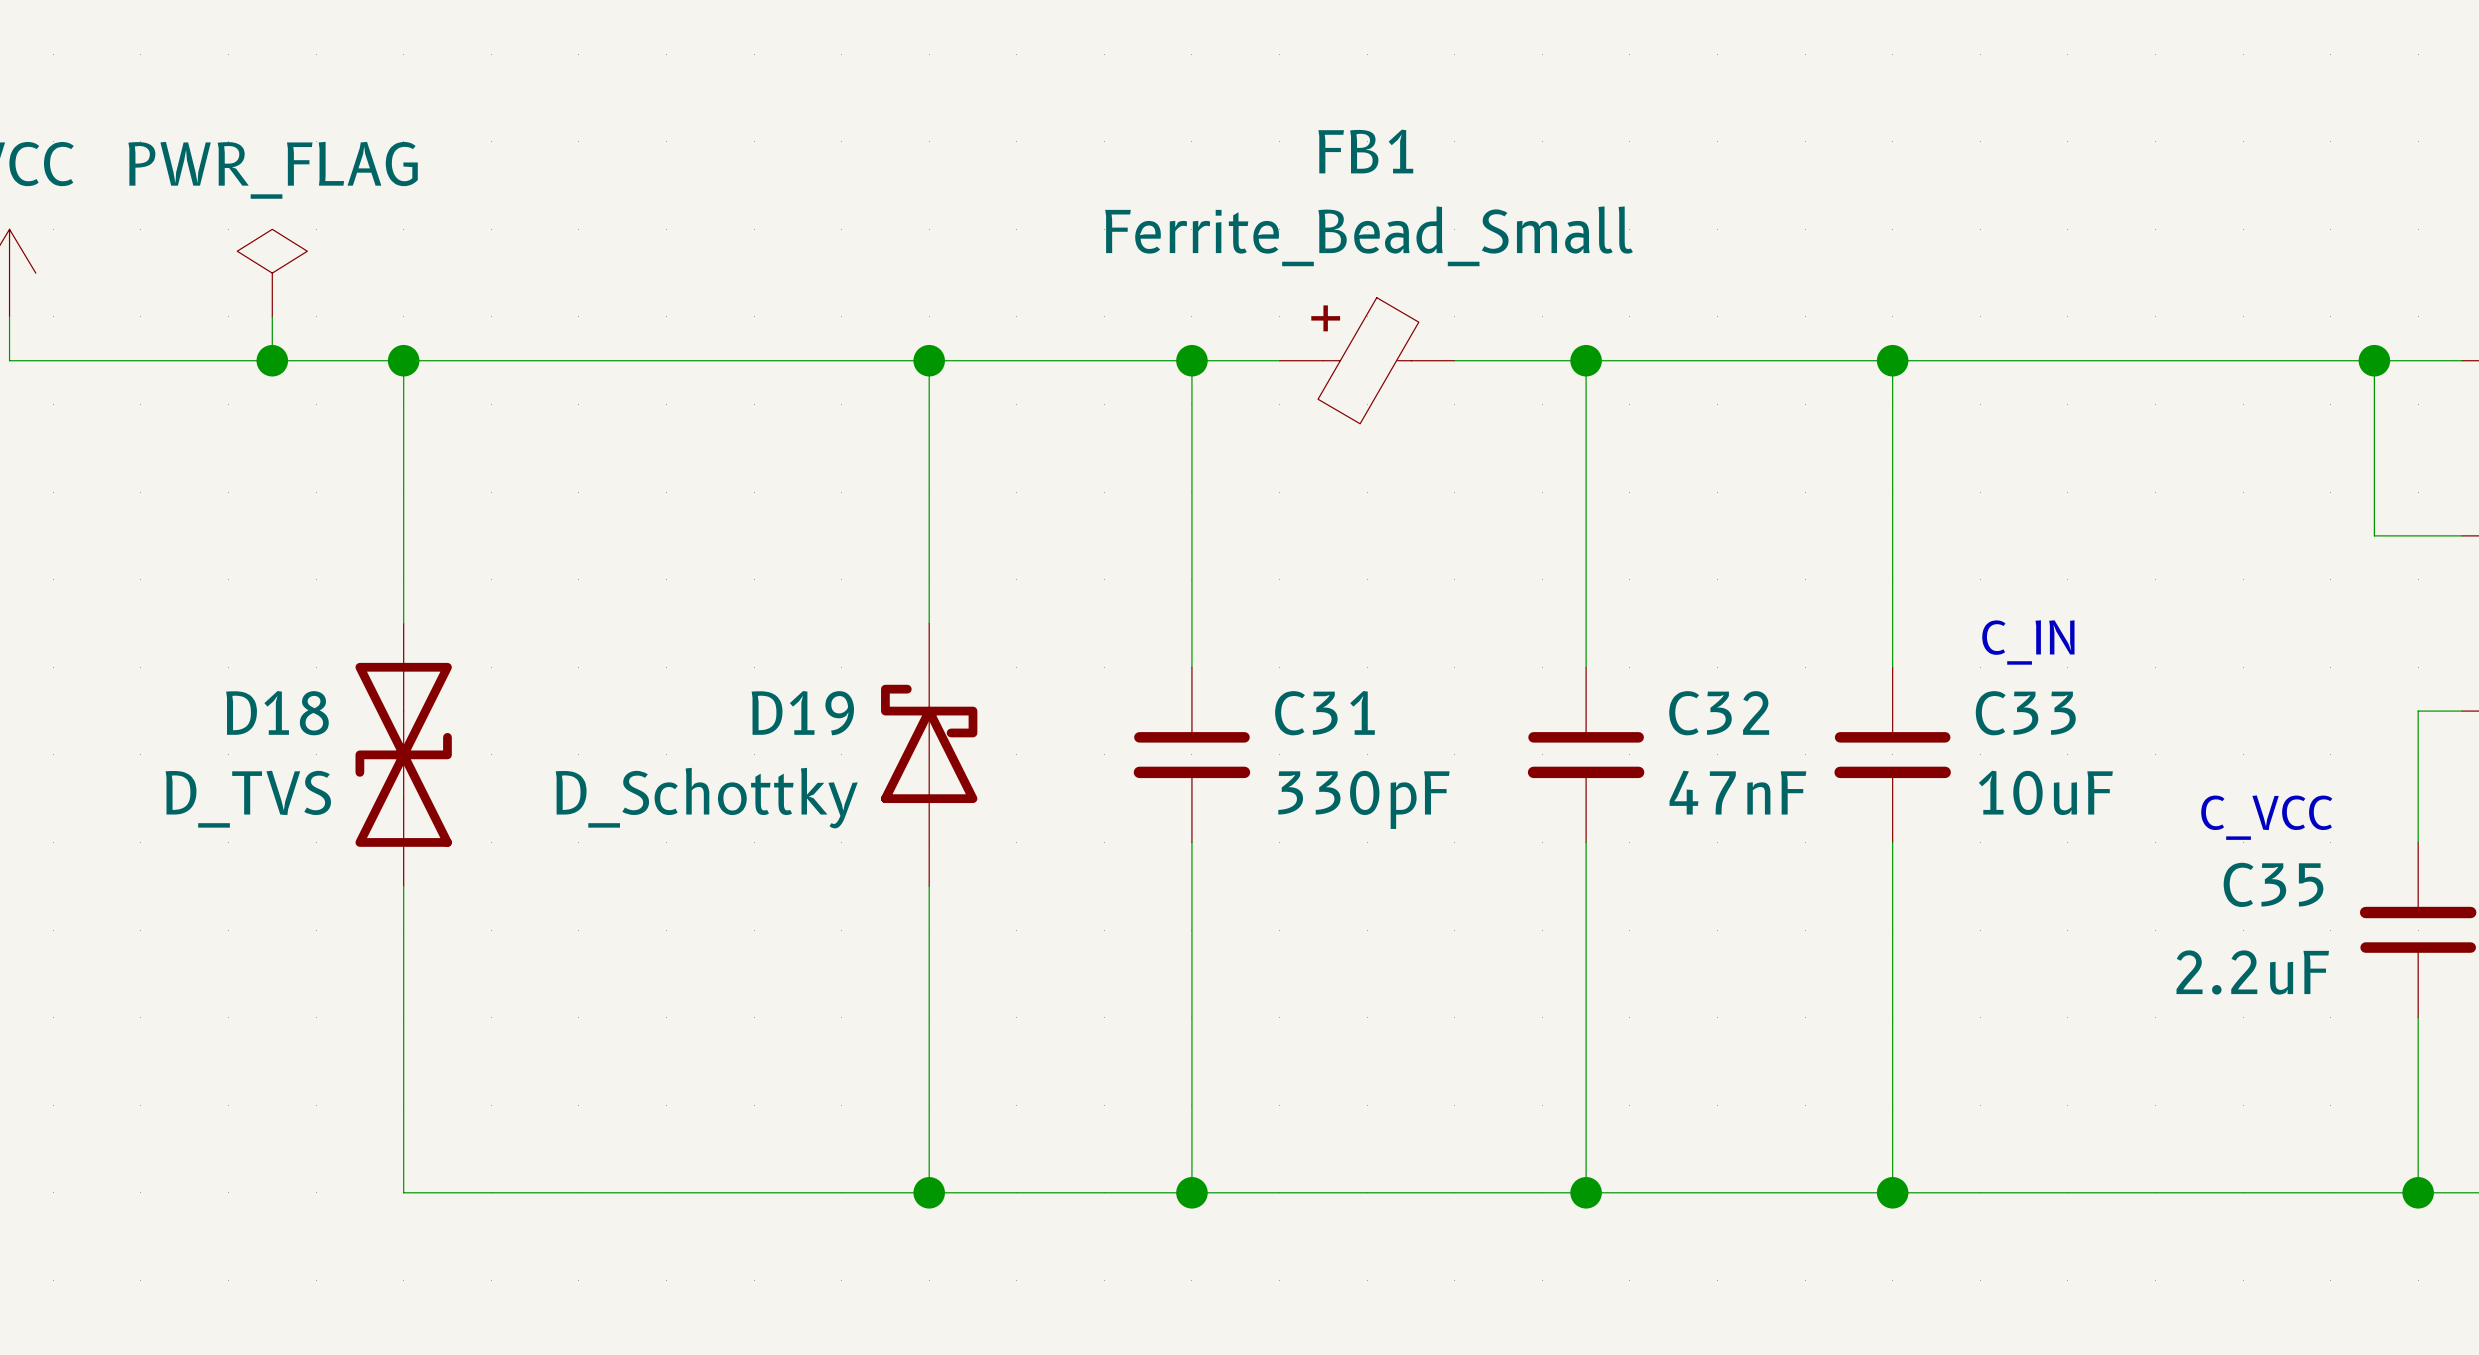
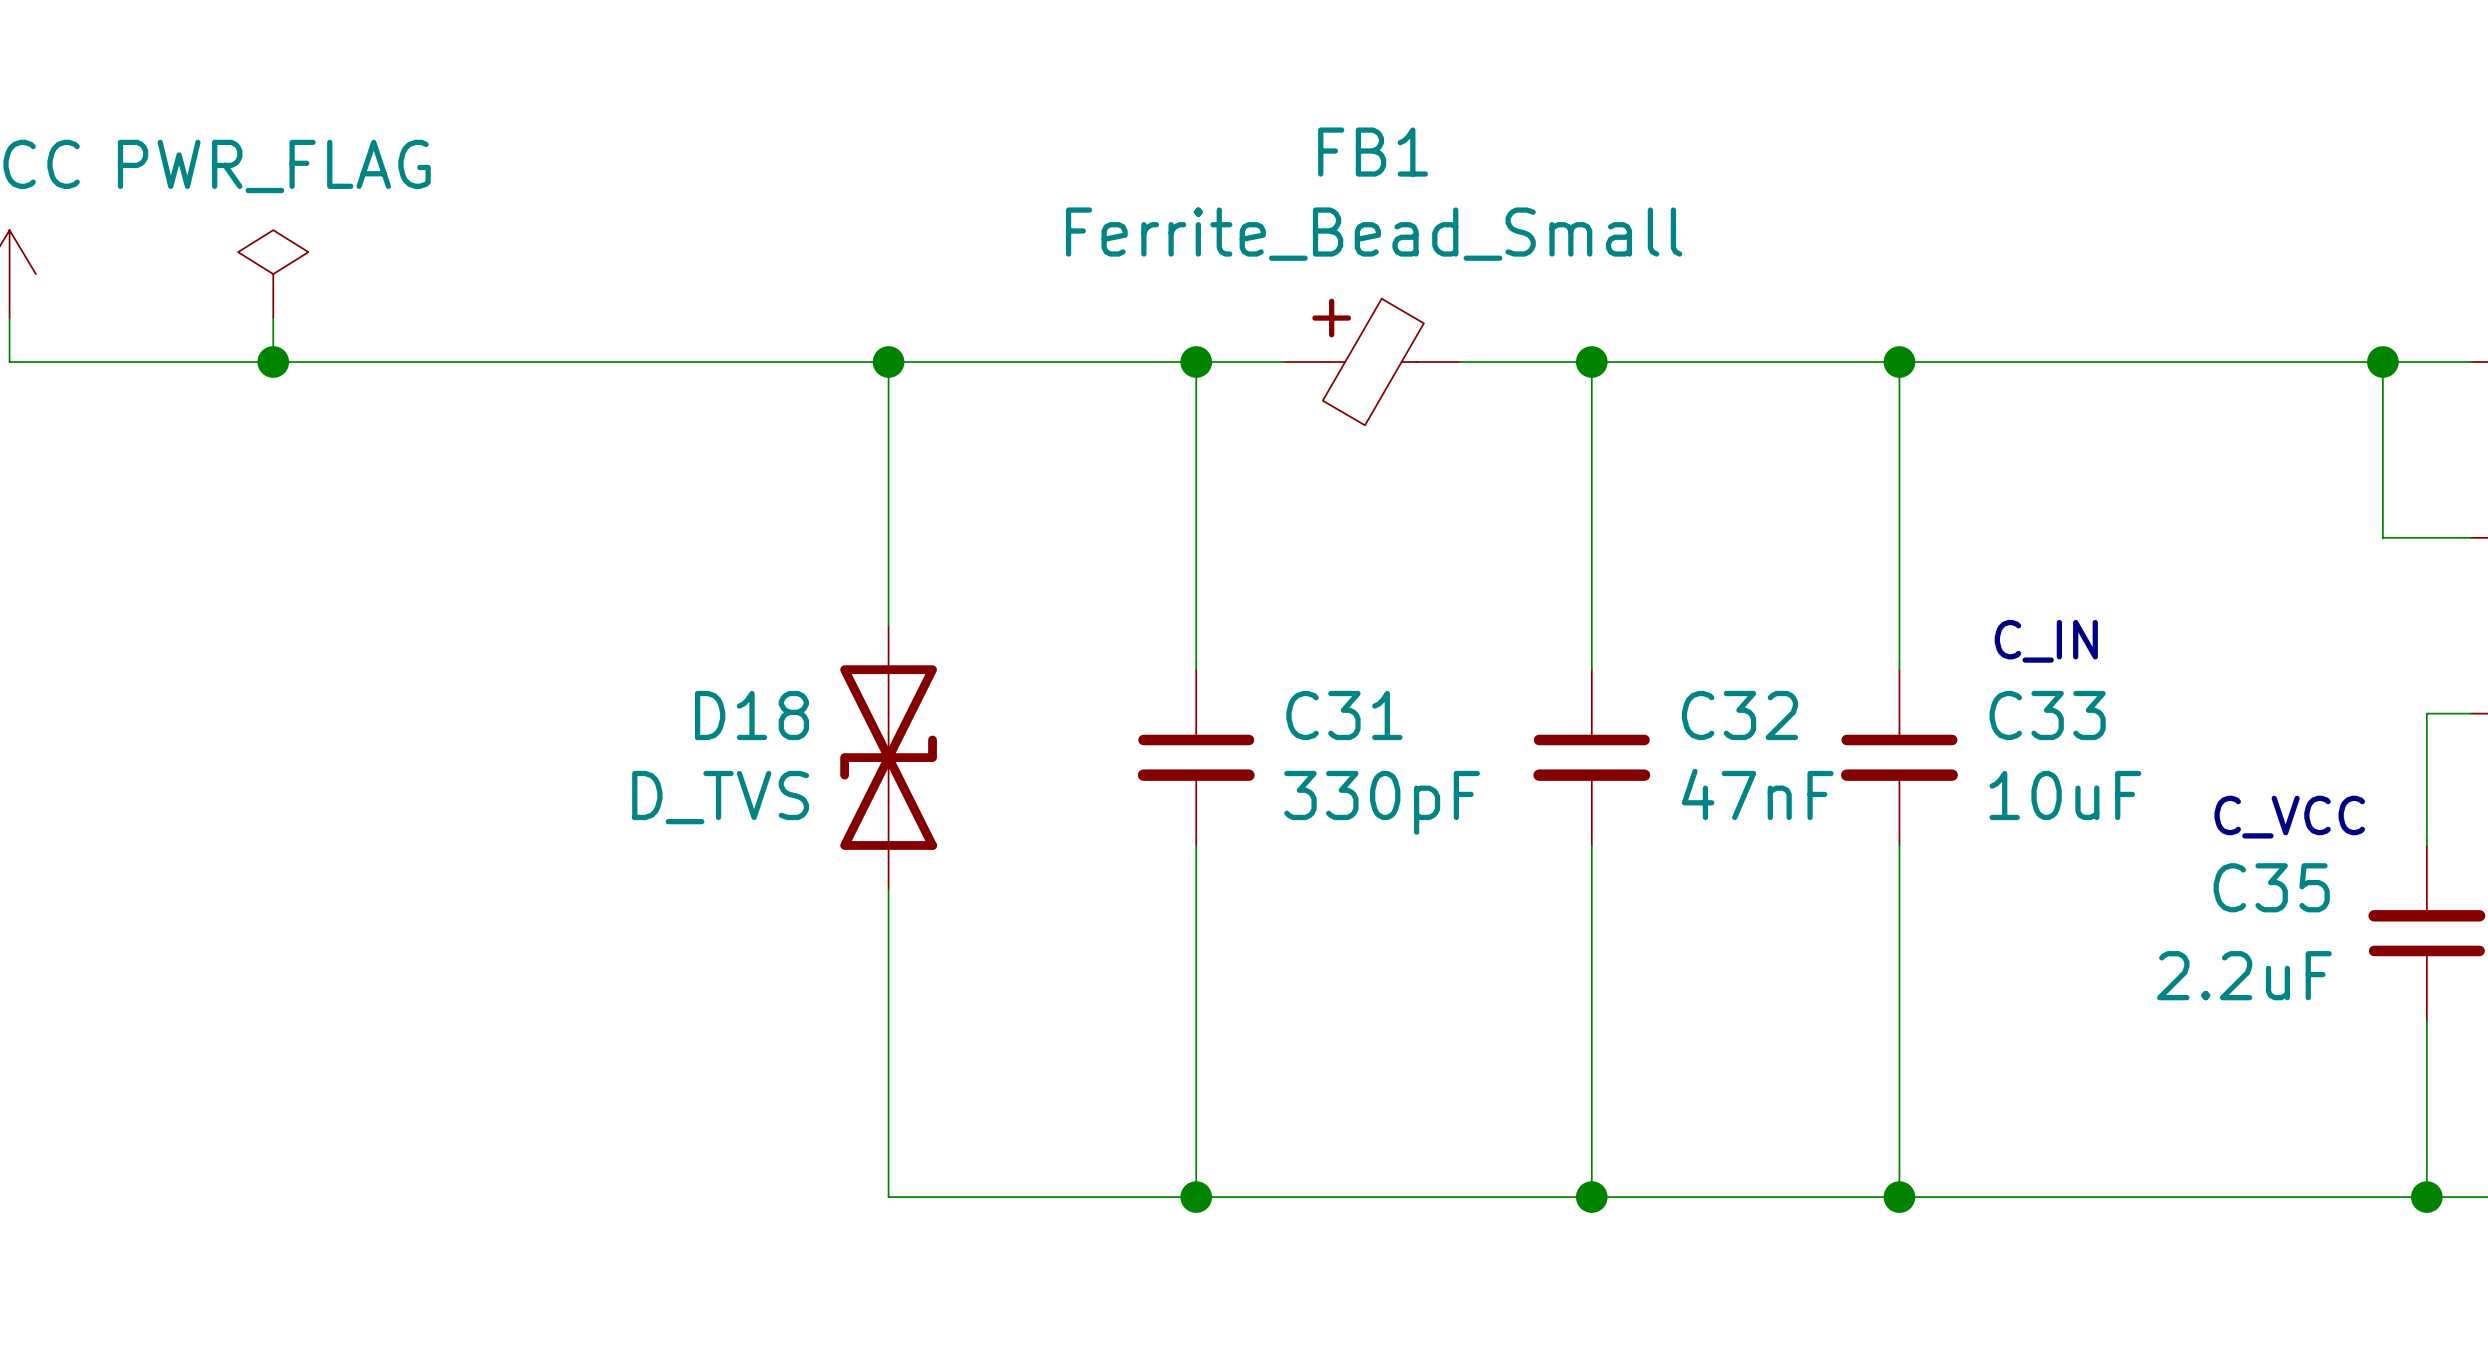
wire: (403, 360) (403, 623) -> none
junction: (403, 360) -> none
wire: (929, 360) (929, 623) -> (888, 362) (888, 625)
junction position: (929, 360) -> (888, 362)
D18 position: (403, 754) -> (888, 757)
D19: D_Schottky (929, 754) -> none
wire: (403, 886) (403, 1192) (885, 1192) -> (888, 889) (888, 1197)
wire: (929, 886) (929, 1192) -> none
junction: (929, 1192) -> none

